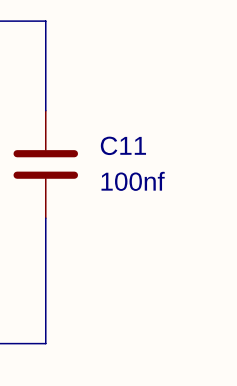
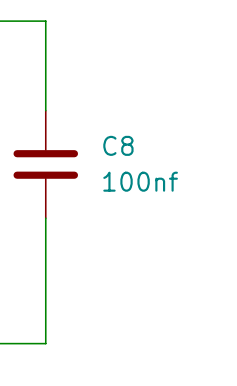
C11 name: C11 (123, 145) -> C8 (118, 145)

